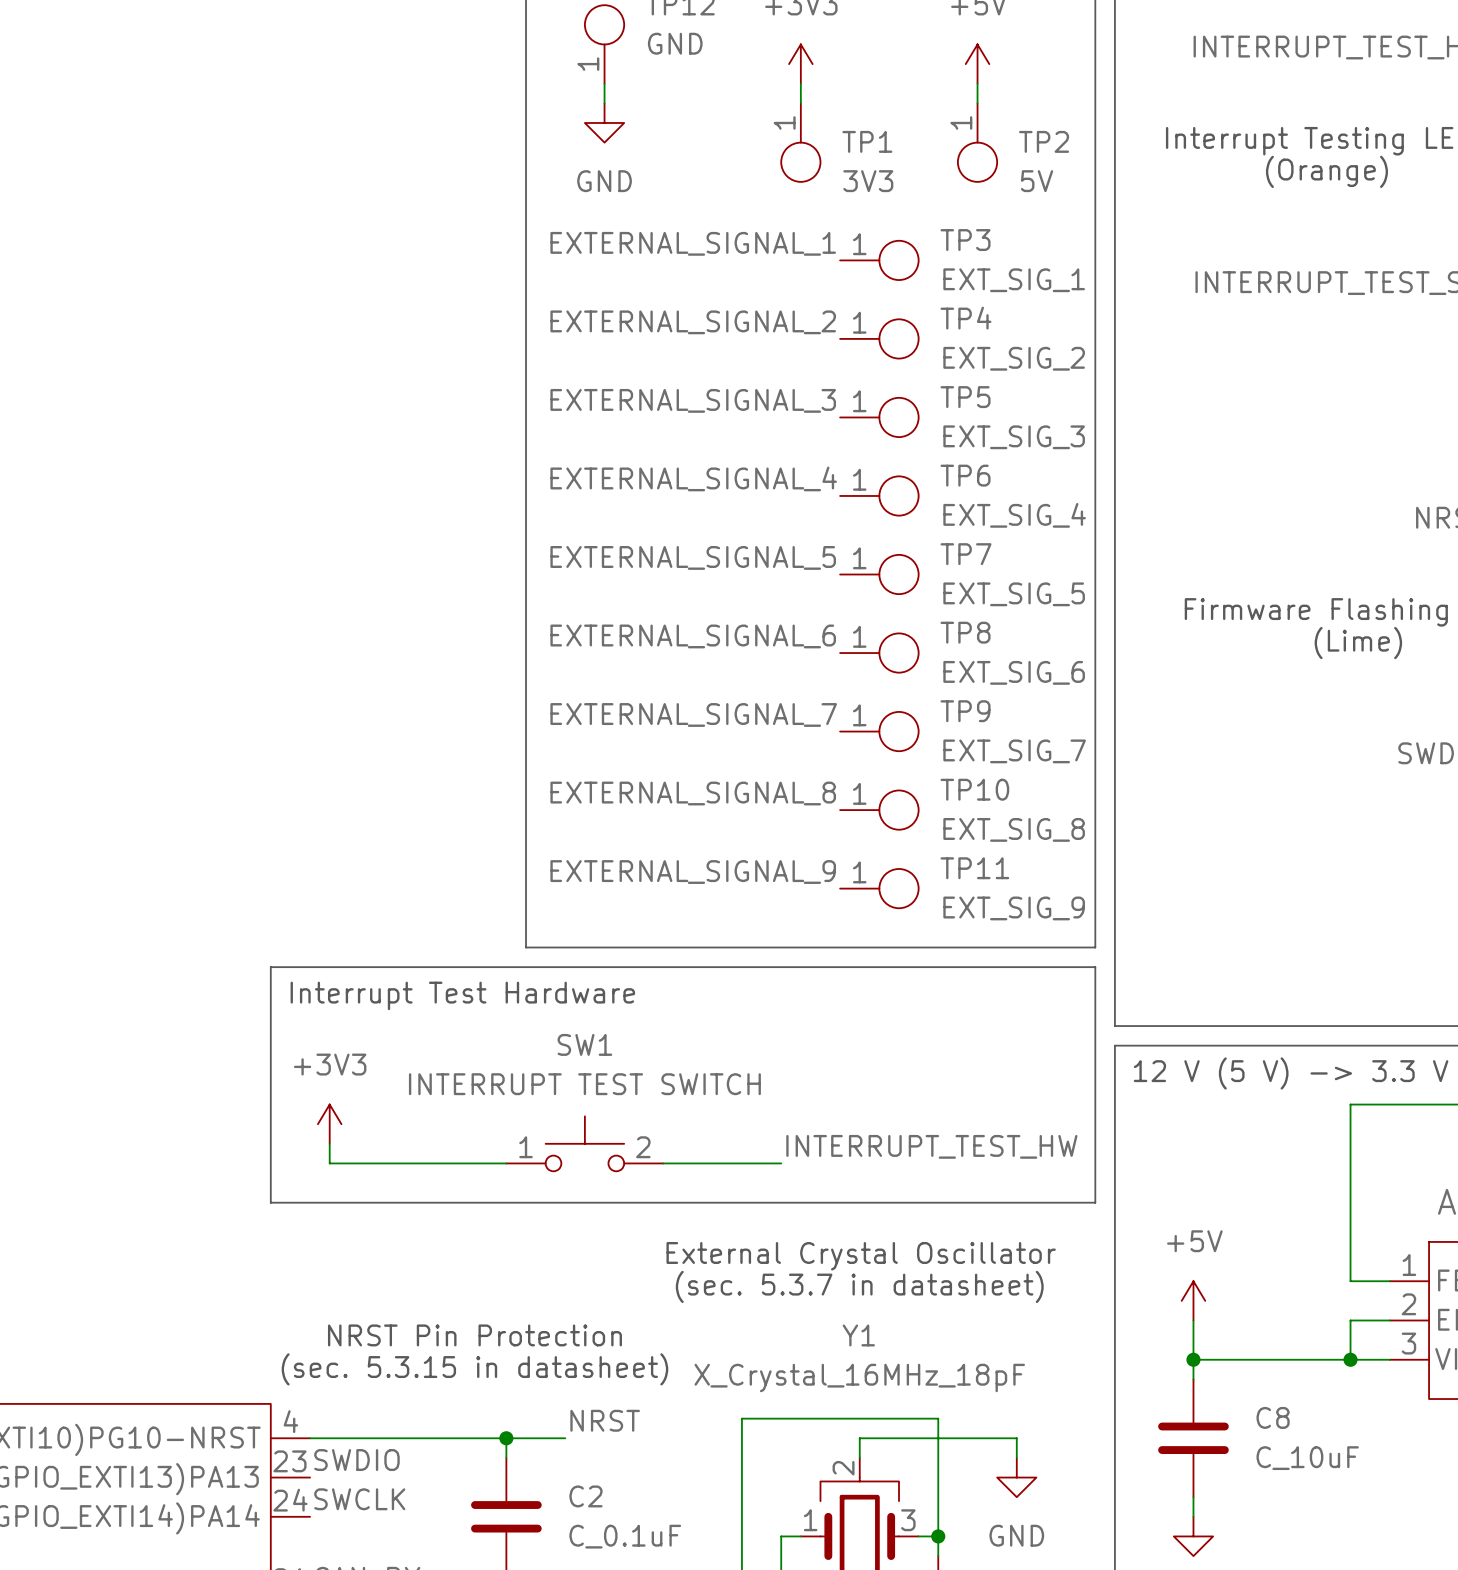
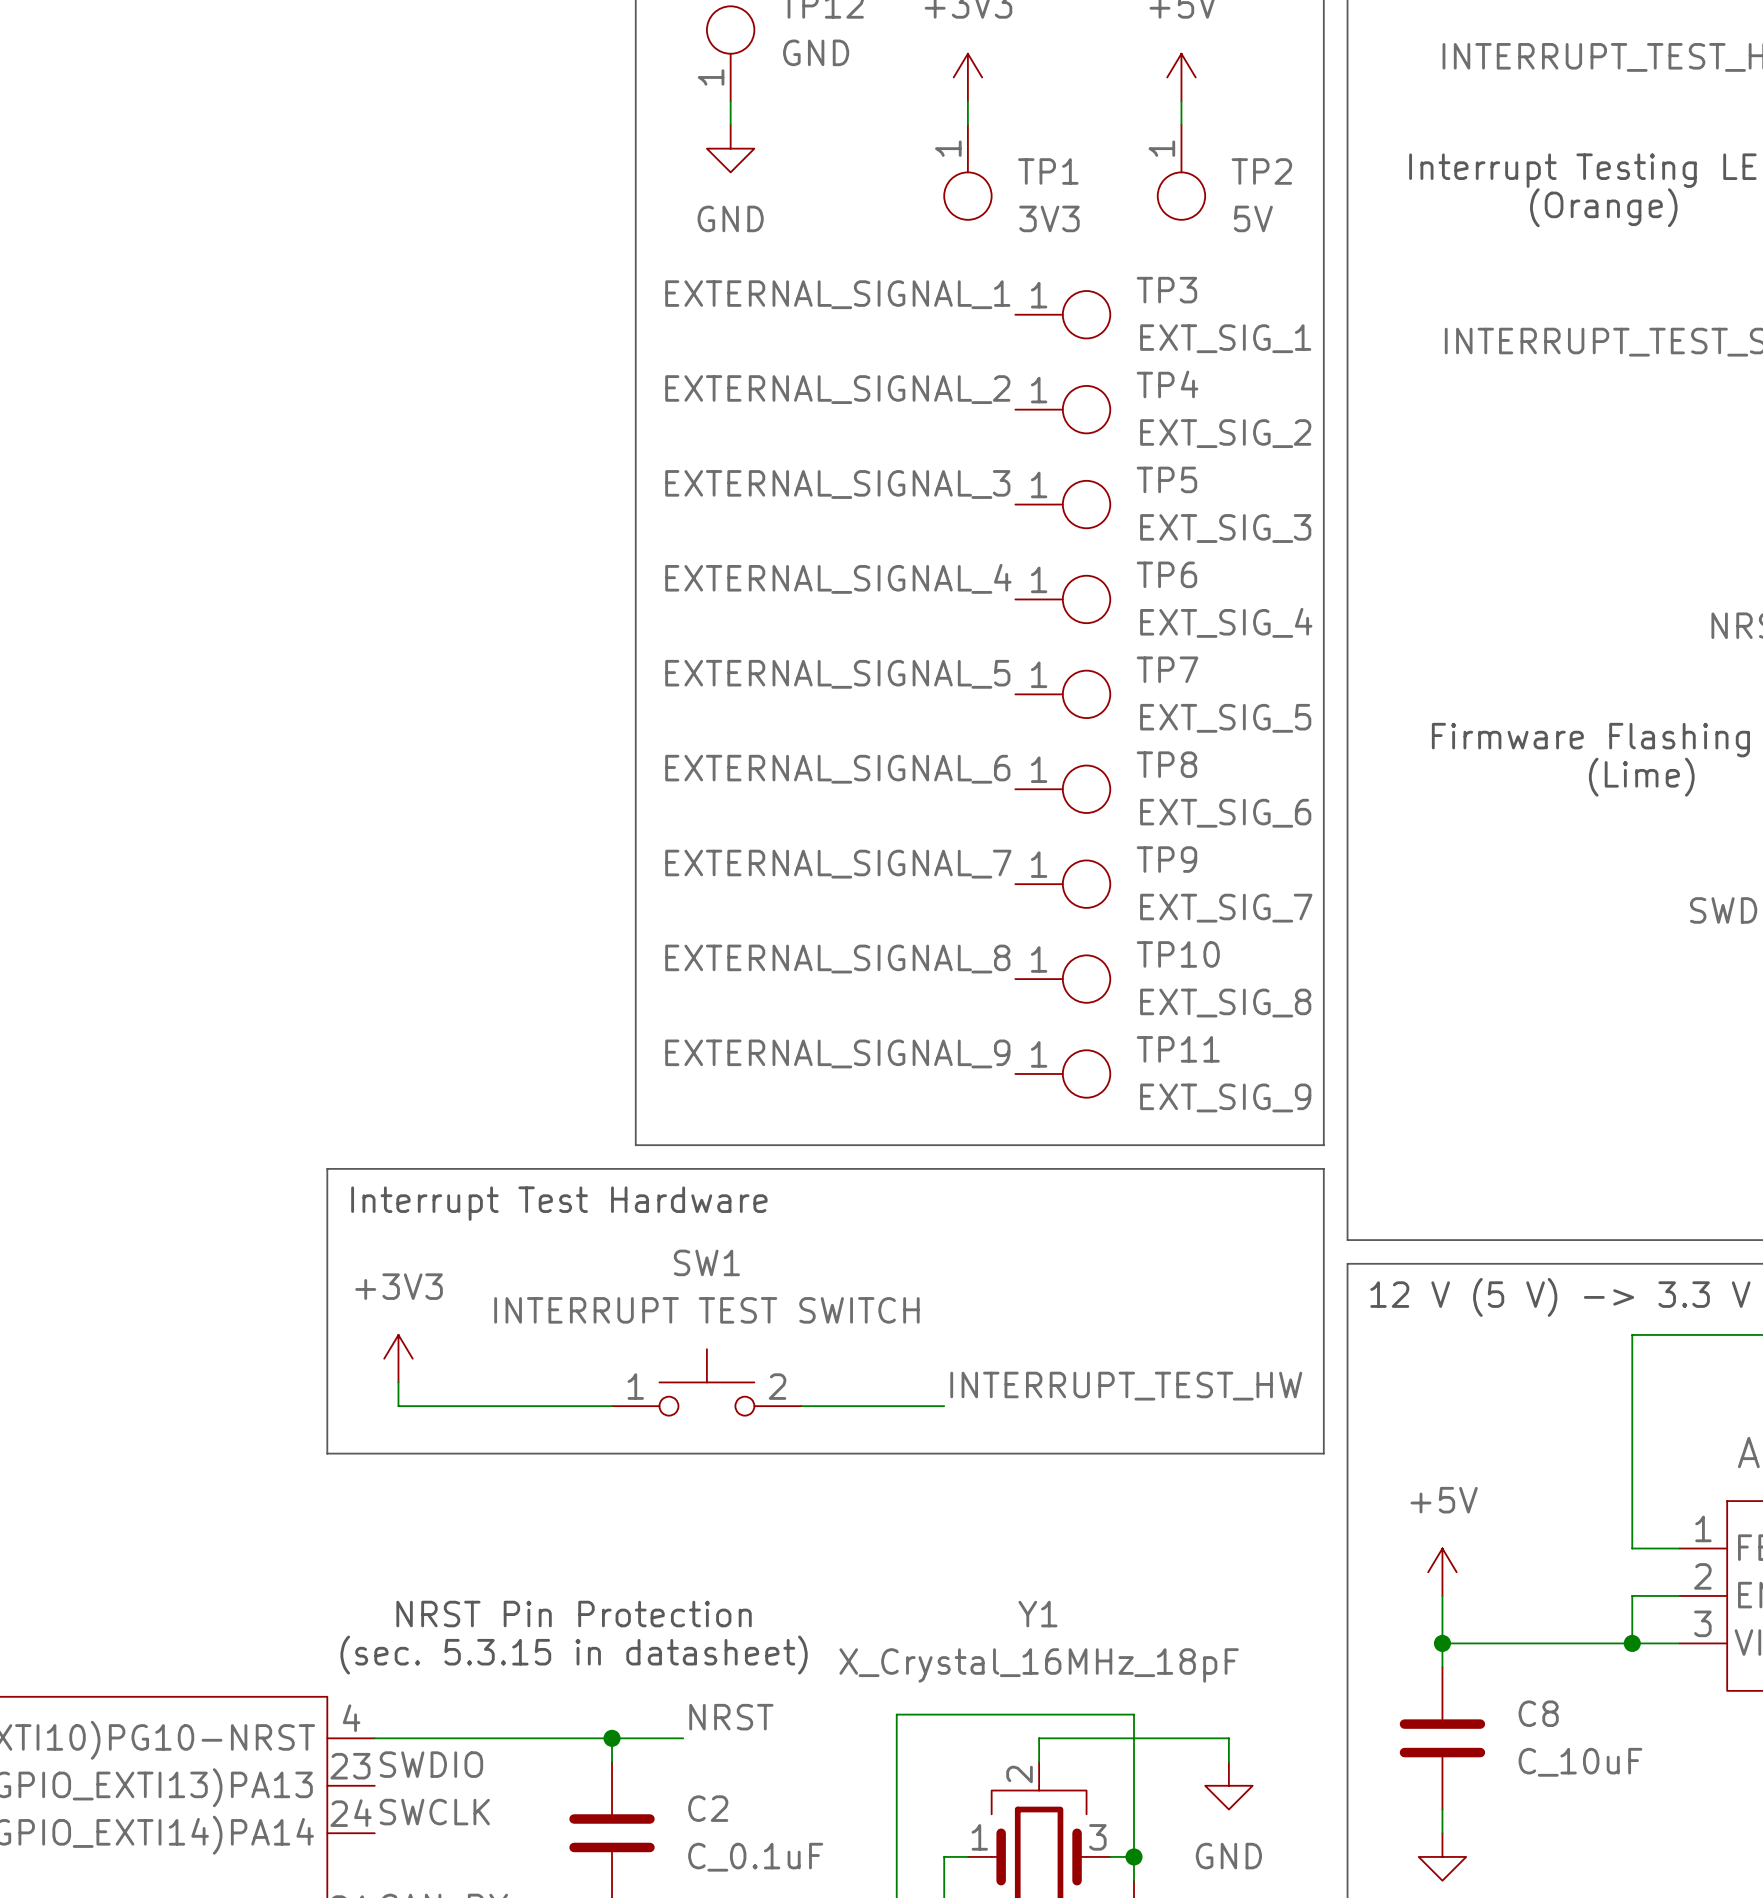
text: External Crystal Oscillator (861, 1256) -> none
text: (sec. 5.3.7 in datasheet) (859, 1286) -> none

